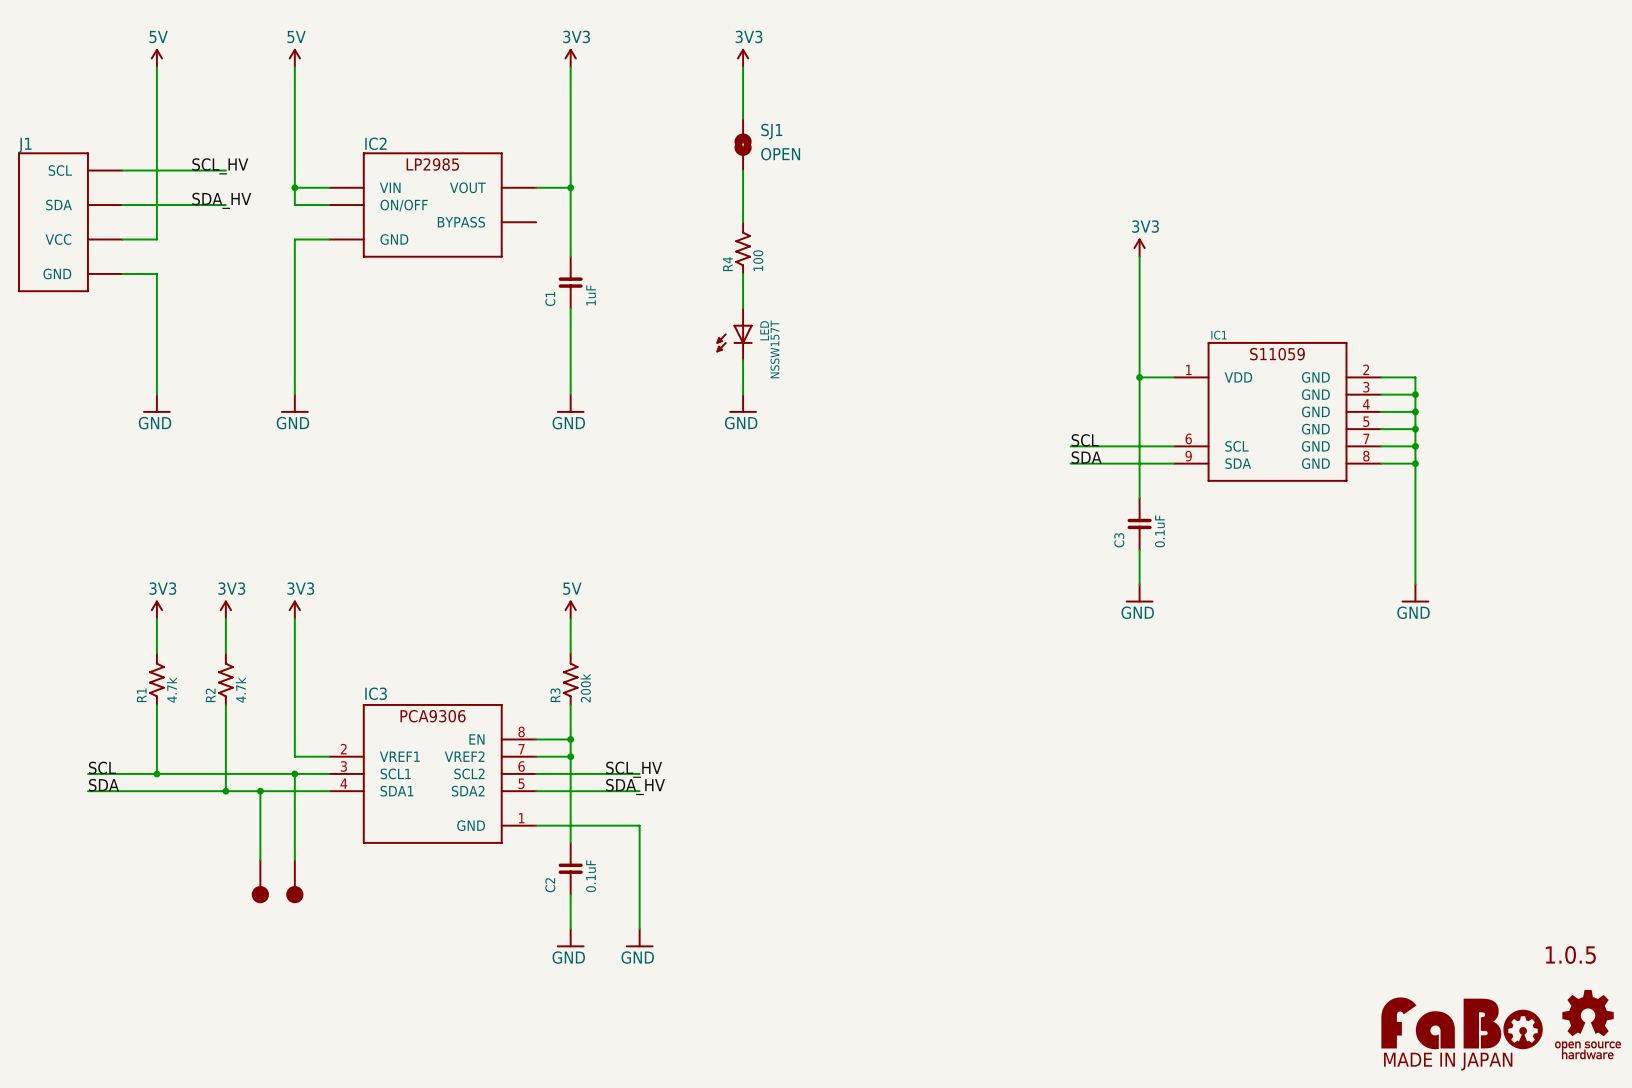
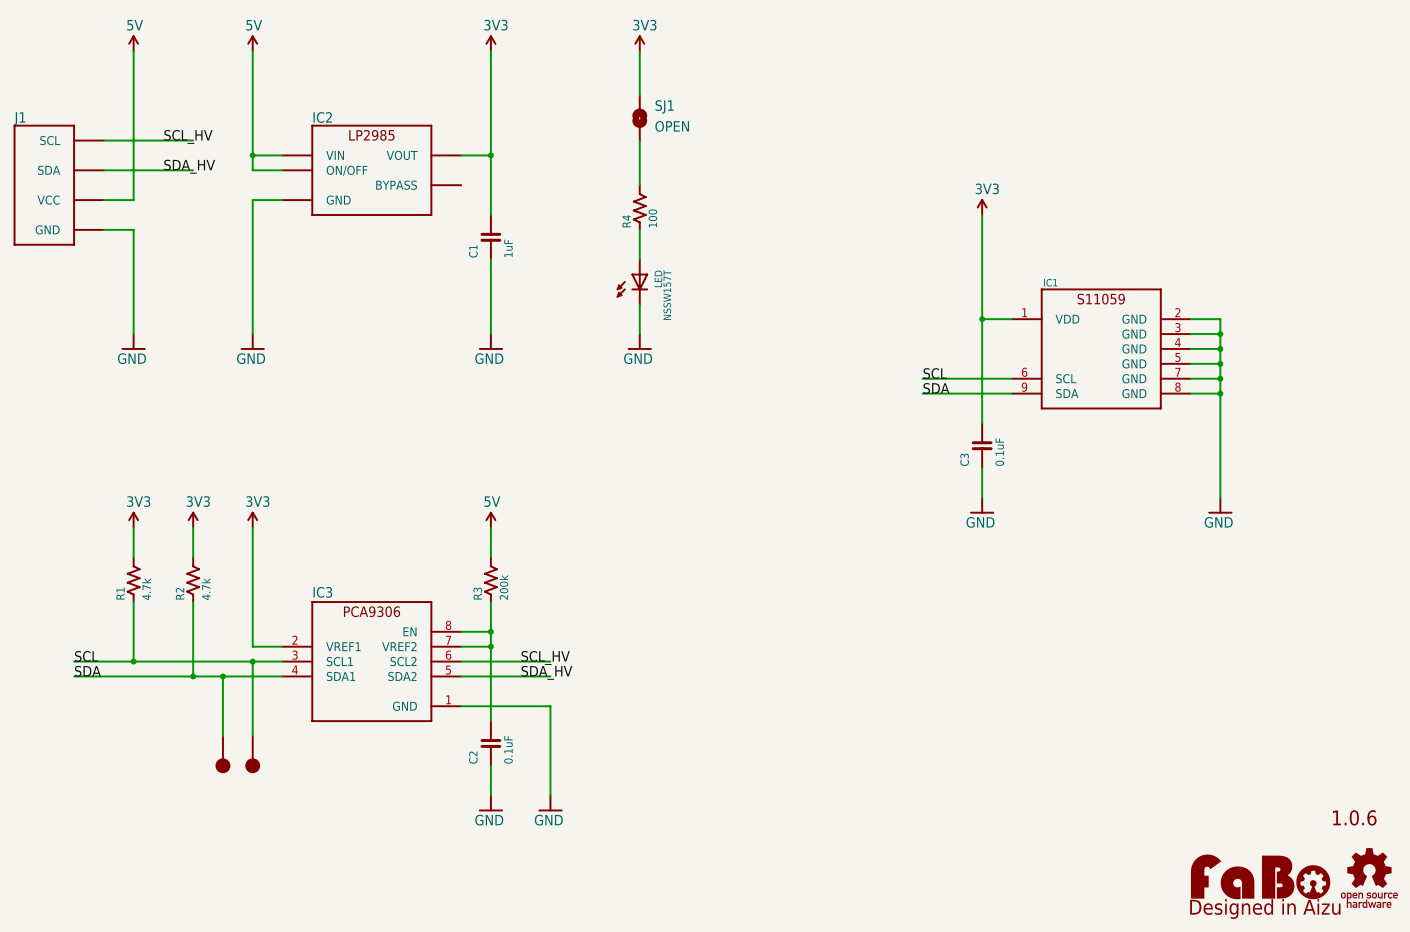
text: 1.0.5 (1570, 954) -> 1.0.6 (1354, 817)
part text: none -> Designed in Aizu (1265, 909)
part text: MADE IN JAPAN (1448, 1061) -> none

